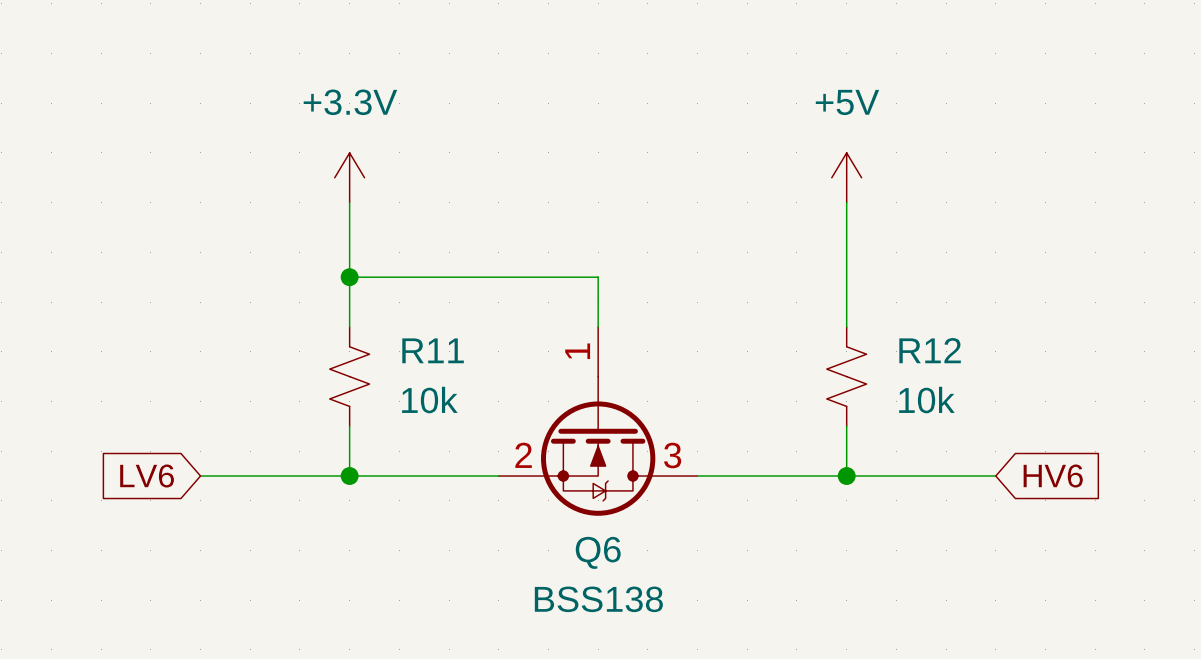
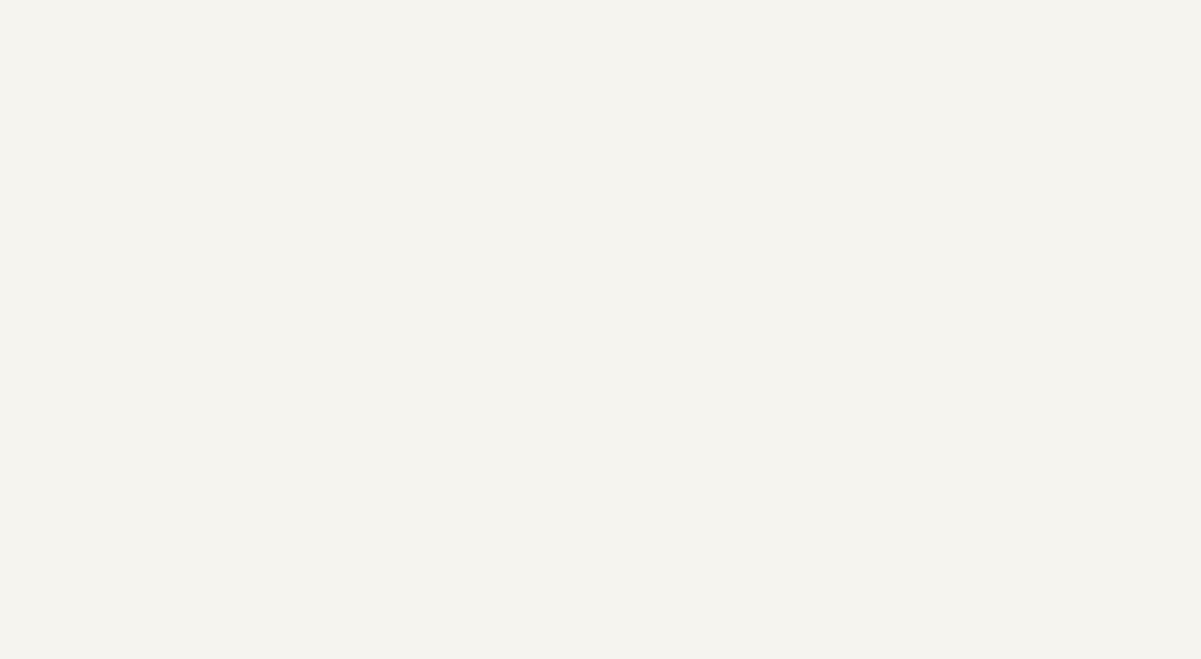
power symbol: +3.3V (349, 177) -> none
power symbol: +5V (846, 177) -> none
wire: (349, 202) (349, 326) -> none
wire: (846, 202) (846, 326) -> none
wire: (349, 277) (598, 277) (598, 326) -> none
junction: (349, 277) -> none
R11: 10k (349, 376) -> none
R12: 10k (846, 376) -> none
Q6: BSS138 (598, 421) -> none
wire: (349, 426) (349, 476) -> none
wire: (846, 426) (846, 476) -> none
global label: LV6 (147, 476) -> none
wire: (200, 476) (498, 476) -> none
junction: (349, 476) -> none
wire: (697, 476) (995, 476) -> none
junction: (846, 476) -> none
global label: HV6 (1053, 476) -> none

